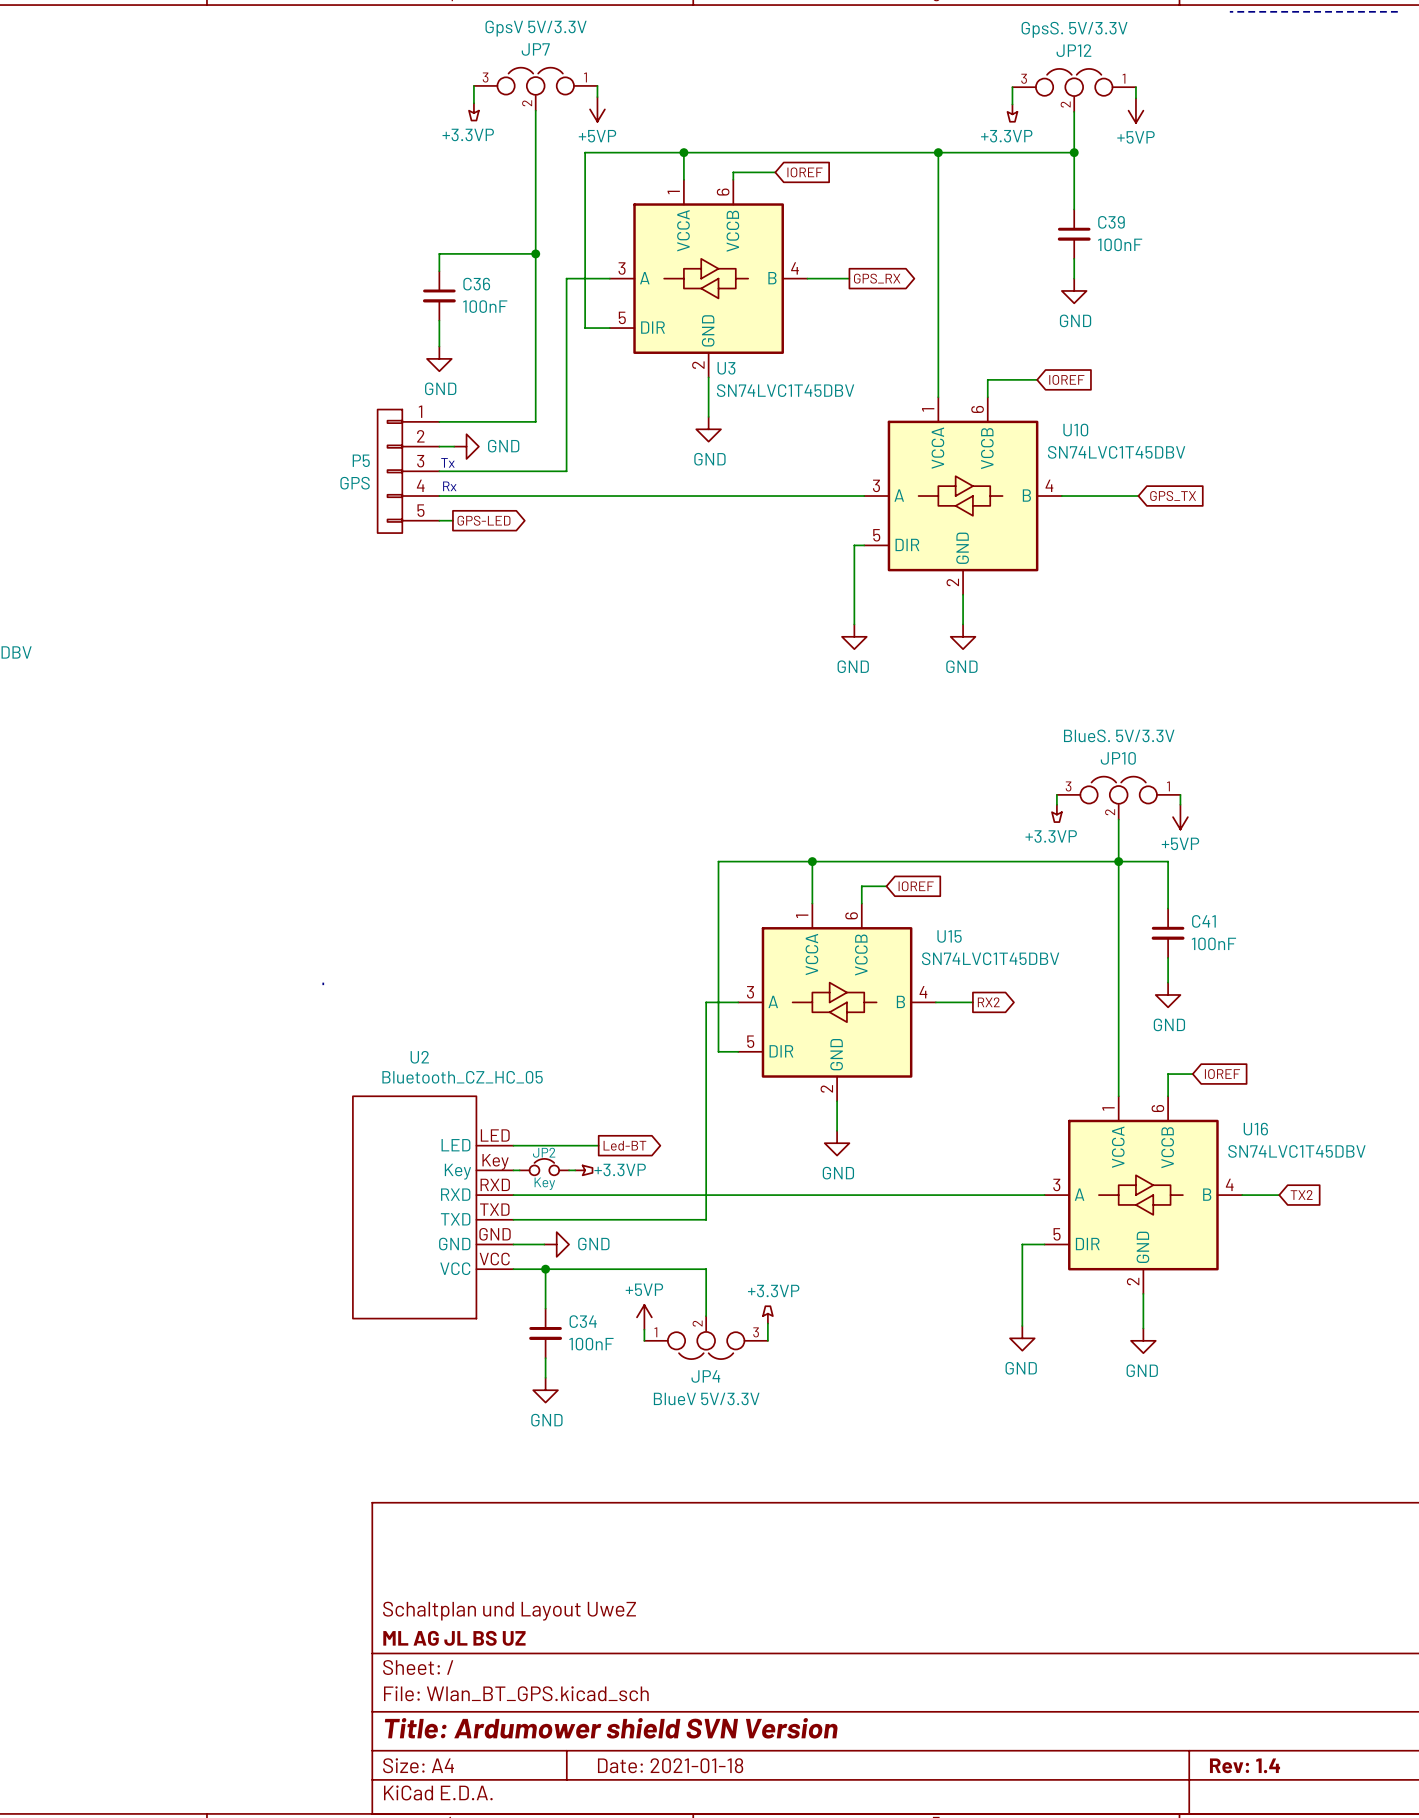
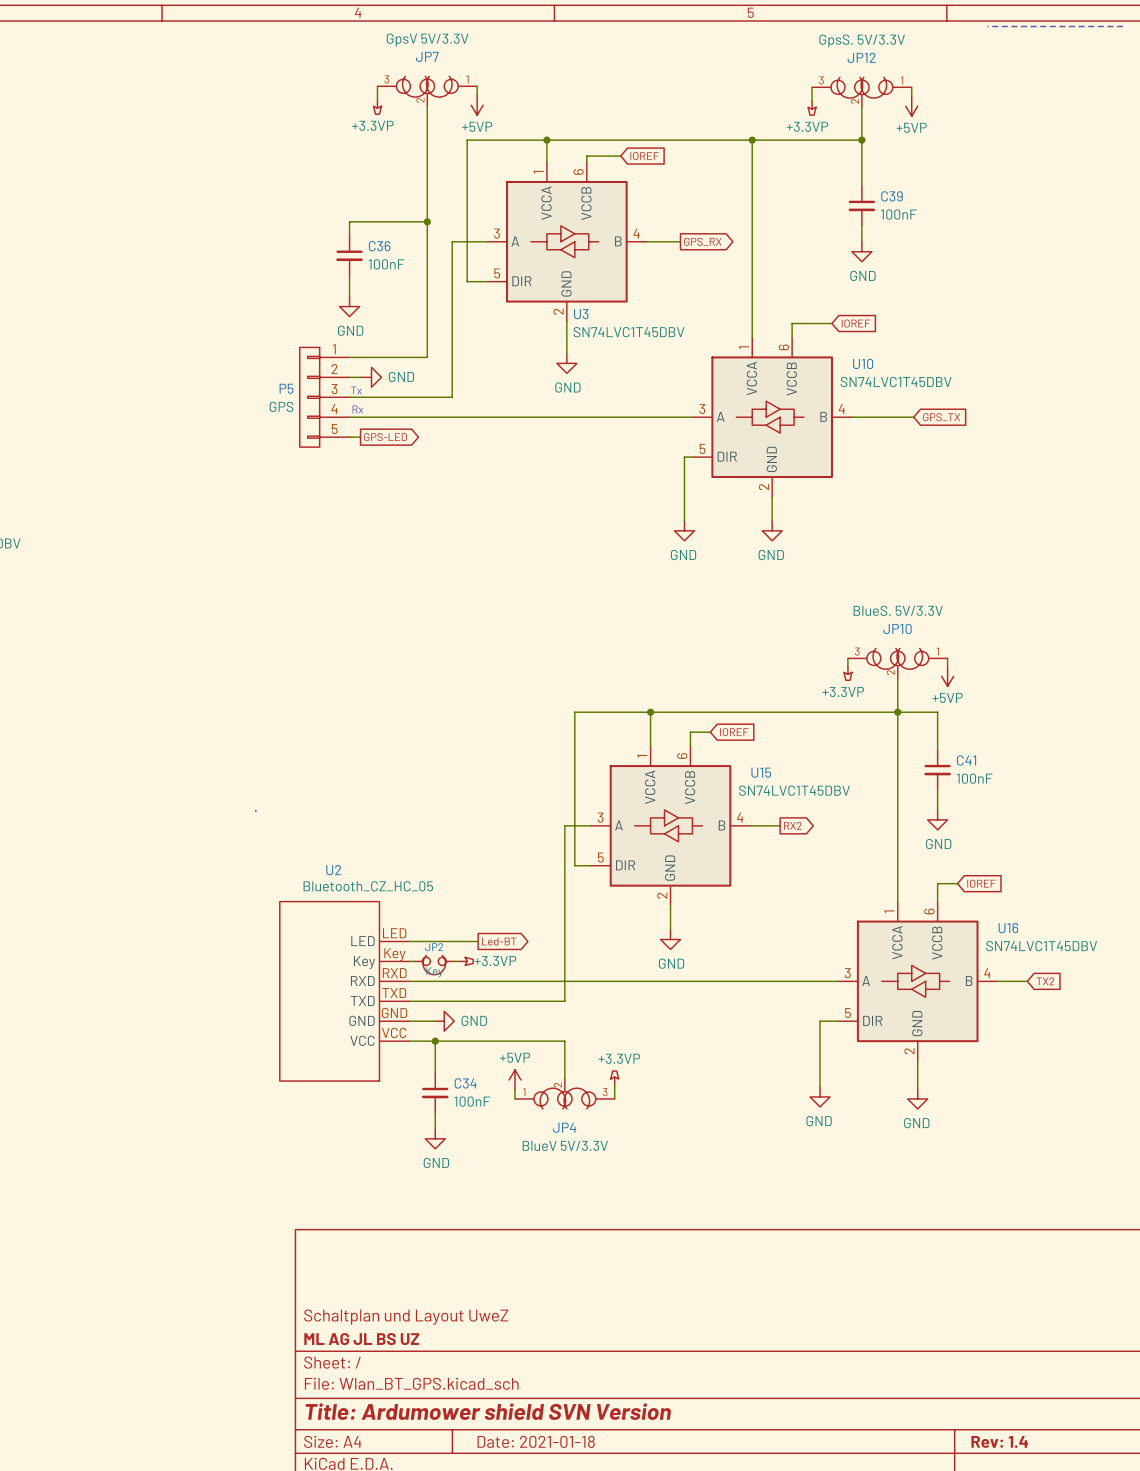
JP7 symbol: [473, 67, 598, 111] -> [377, 76, 478, 107]
JP12 symbol: [1012, 68, 1136, 112] -> [812, 77, 912, 108]
JP10 symbol: [1056, 776, 1181, 820] -> [847, 648, 948, 679]
JP2 symbol: [519, 1158, 570, 1176] -> [414, 955, 455, 975]
JP4 symbol: [644, 1316, 768, 1360] -> [515, 1079, 615, 1109]

